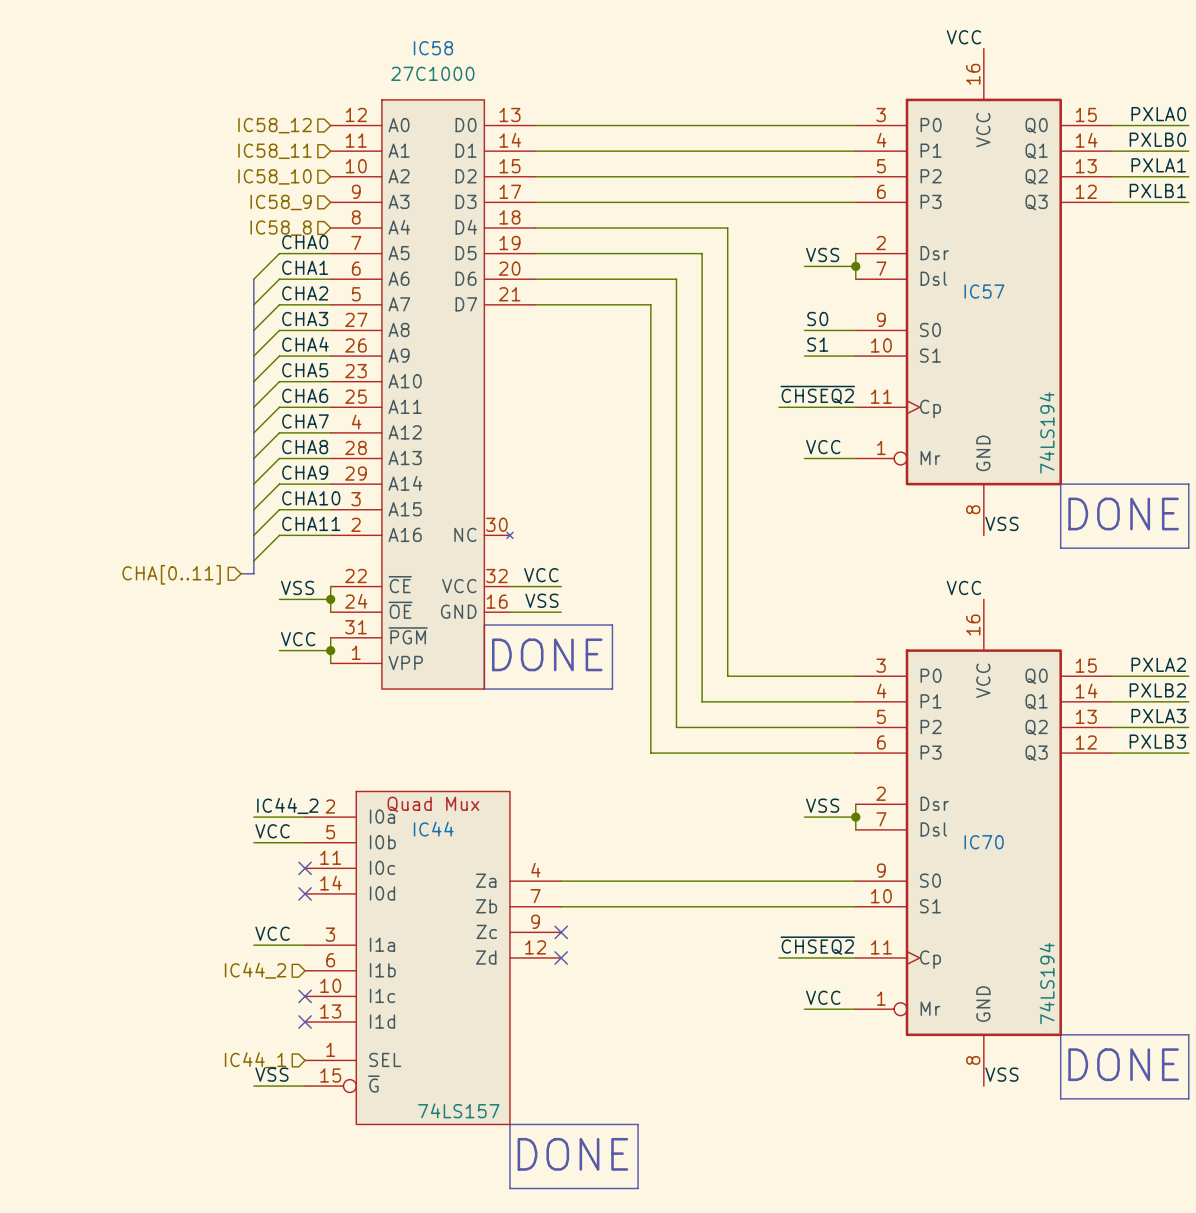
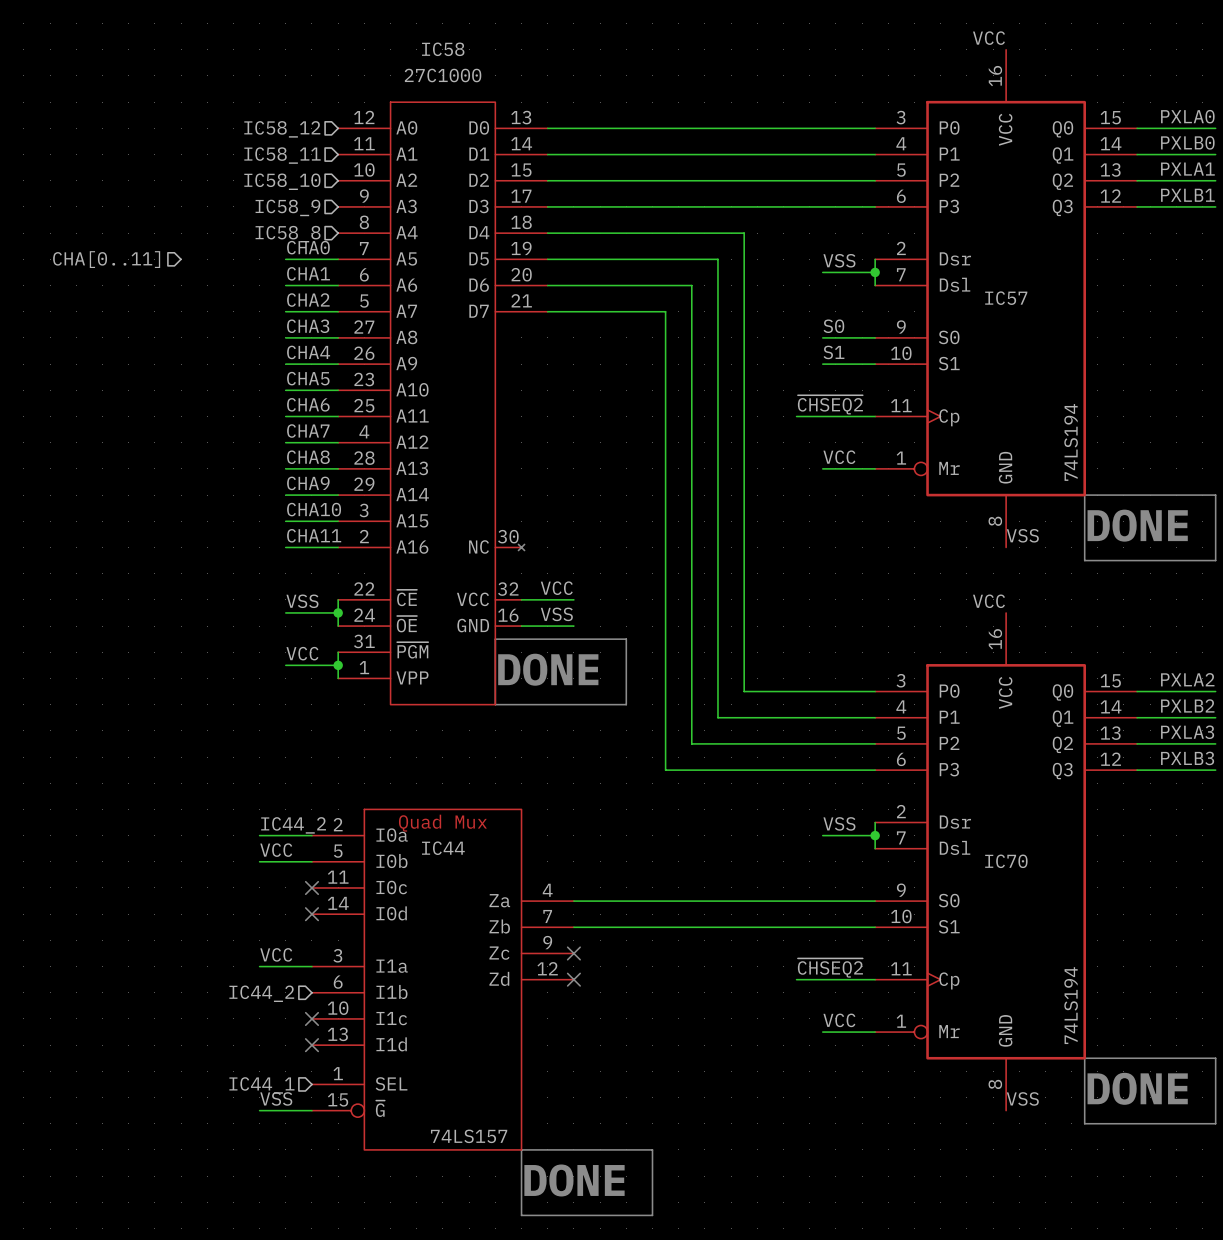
wire: (279, 253) (253, 279) -> none
hierarchical label: none -> CHA[0..11] (106, 259)
bus: (253, 279) (253, 573) (241, 573) -> none
wire: (279, 279) (253, 304) -> none
wire: (279, 304) (253, 330) -> none
wire: (279, 330) (253, 356) -> none
wire: (279, 356) (253, 381) -> none
wire: (279, 381) (253, 407) -> none
wire: (279, 407) (253, 432) -> none
wire: (279, 432) (253, 458) -> none
wire: (279, 458) (253, 484) -> none
wire: (279, 484) (253, 509) -> none
wire: (279, 509) (253, 535) -> none
wire: (279, 535) (253, 560) -> none
hierarchical label: CHA[0..11] (171, 574) -> none

